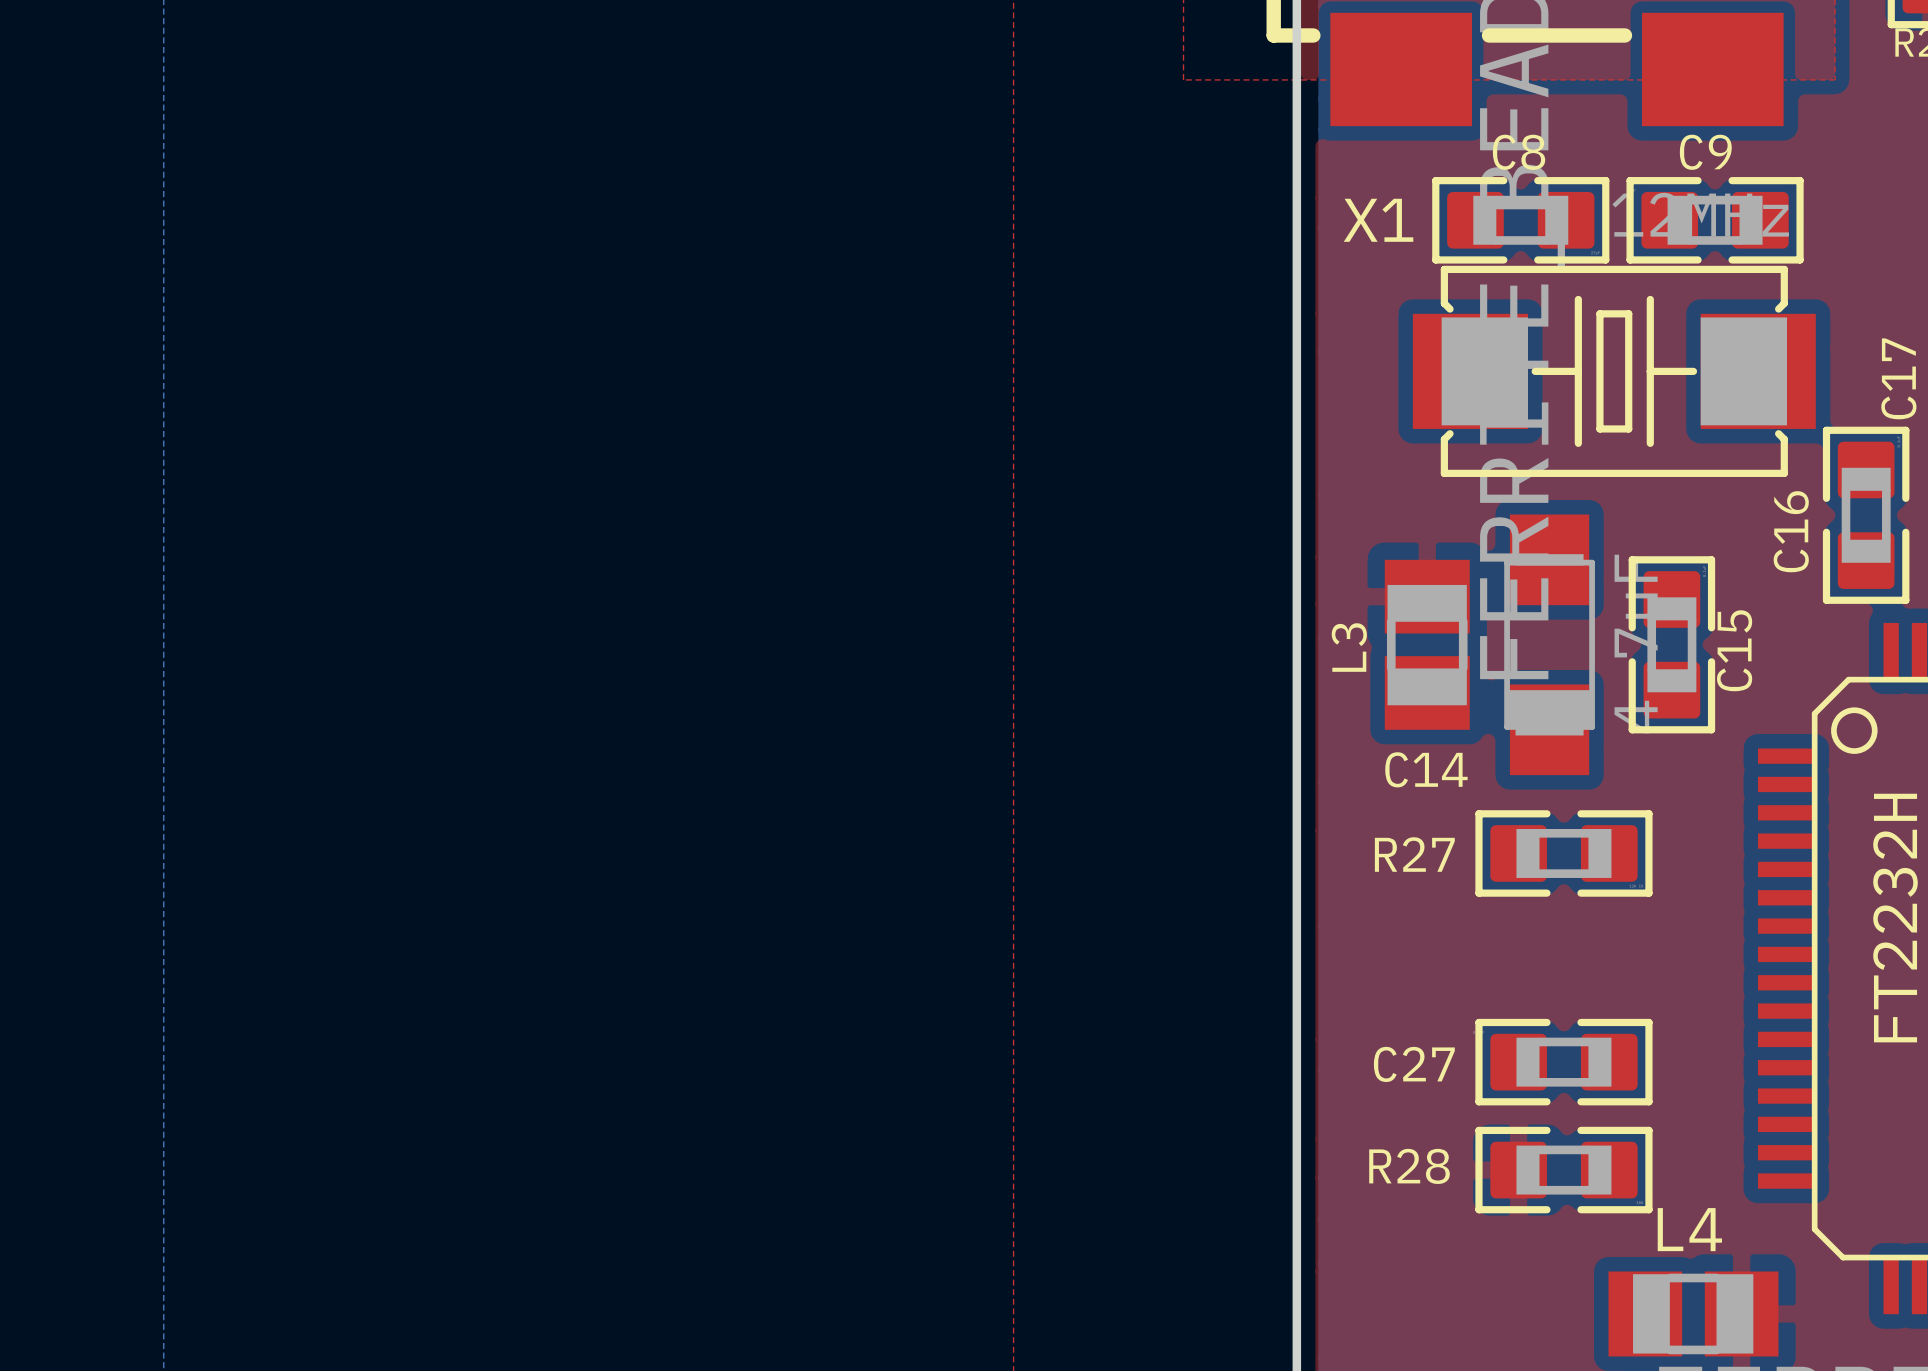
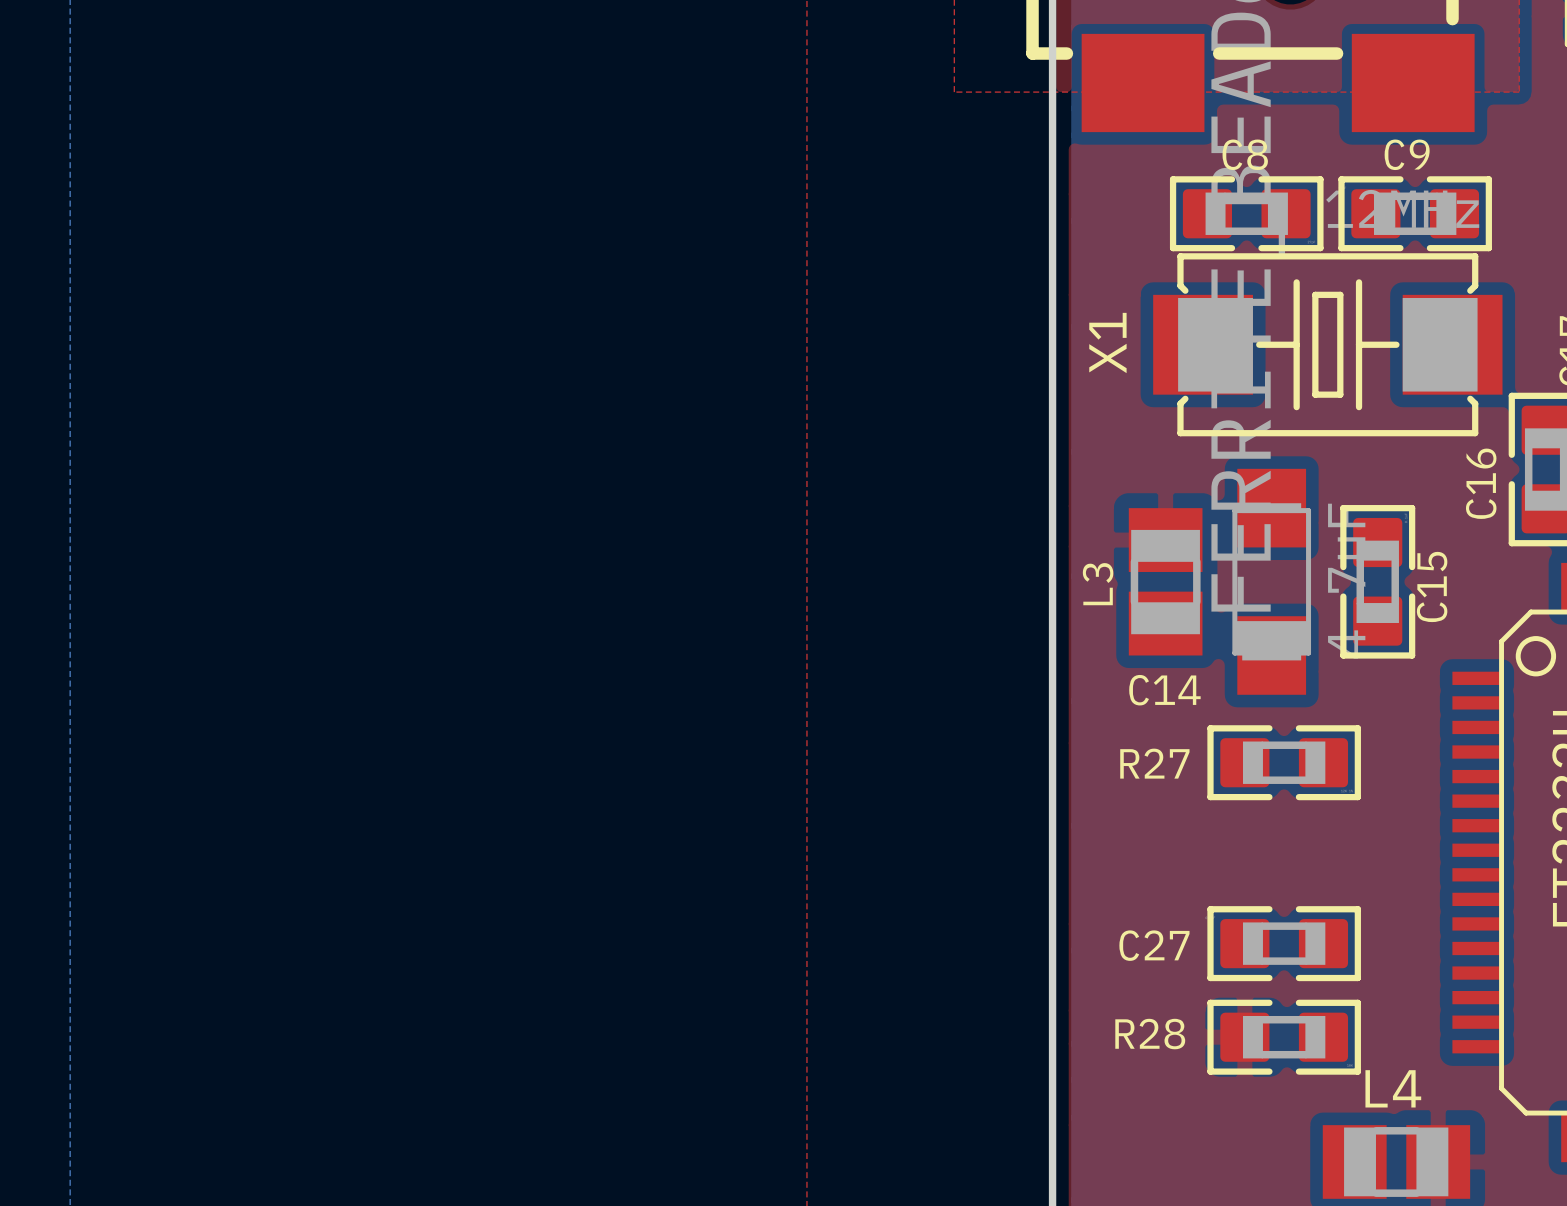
X1 name rotation: 0° (1378, 220) -> 90° counterclockwise (1107, 343)
X1 name position: X1 (1378, 220) -> X1 (1107, 343)

